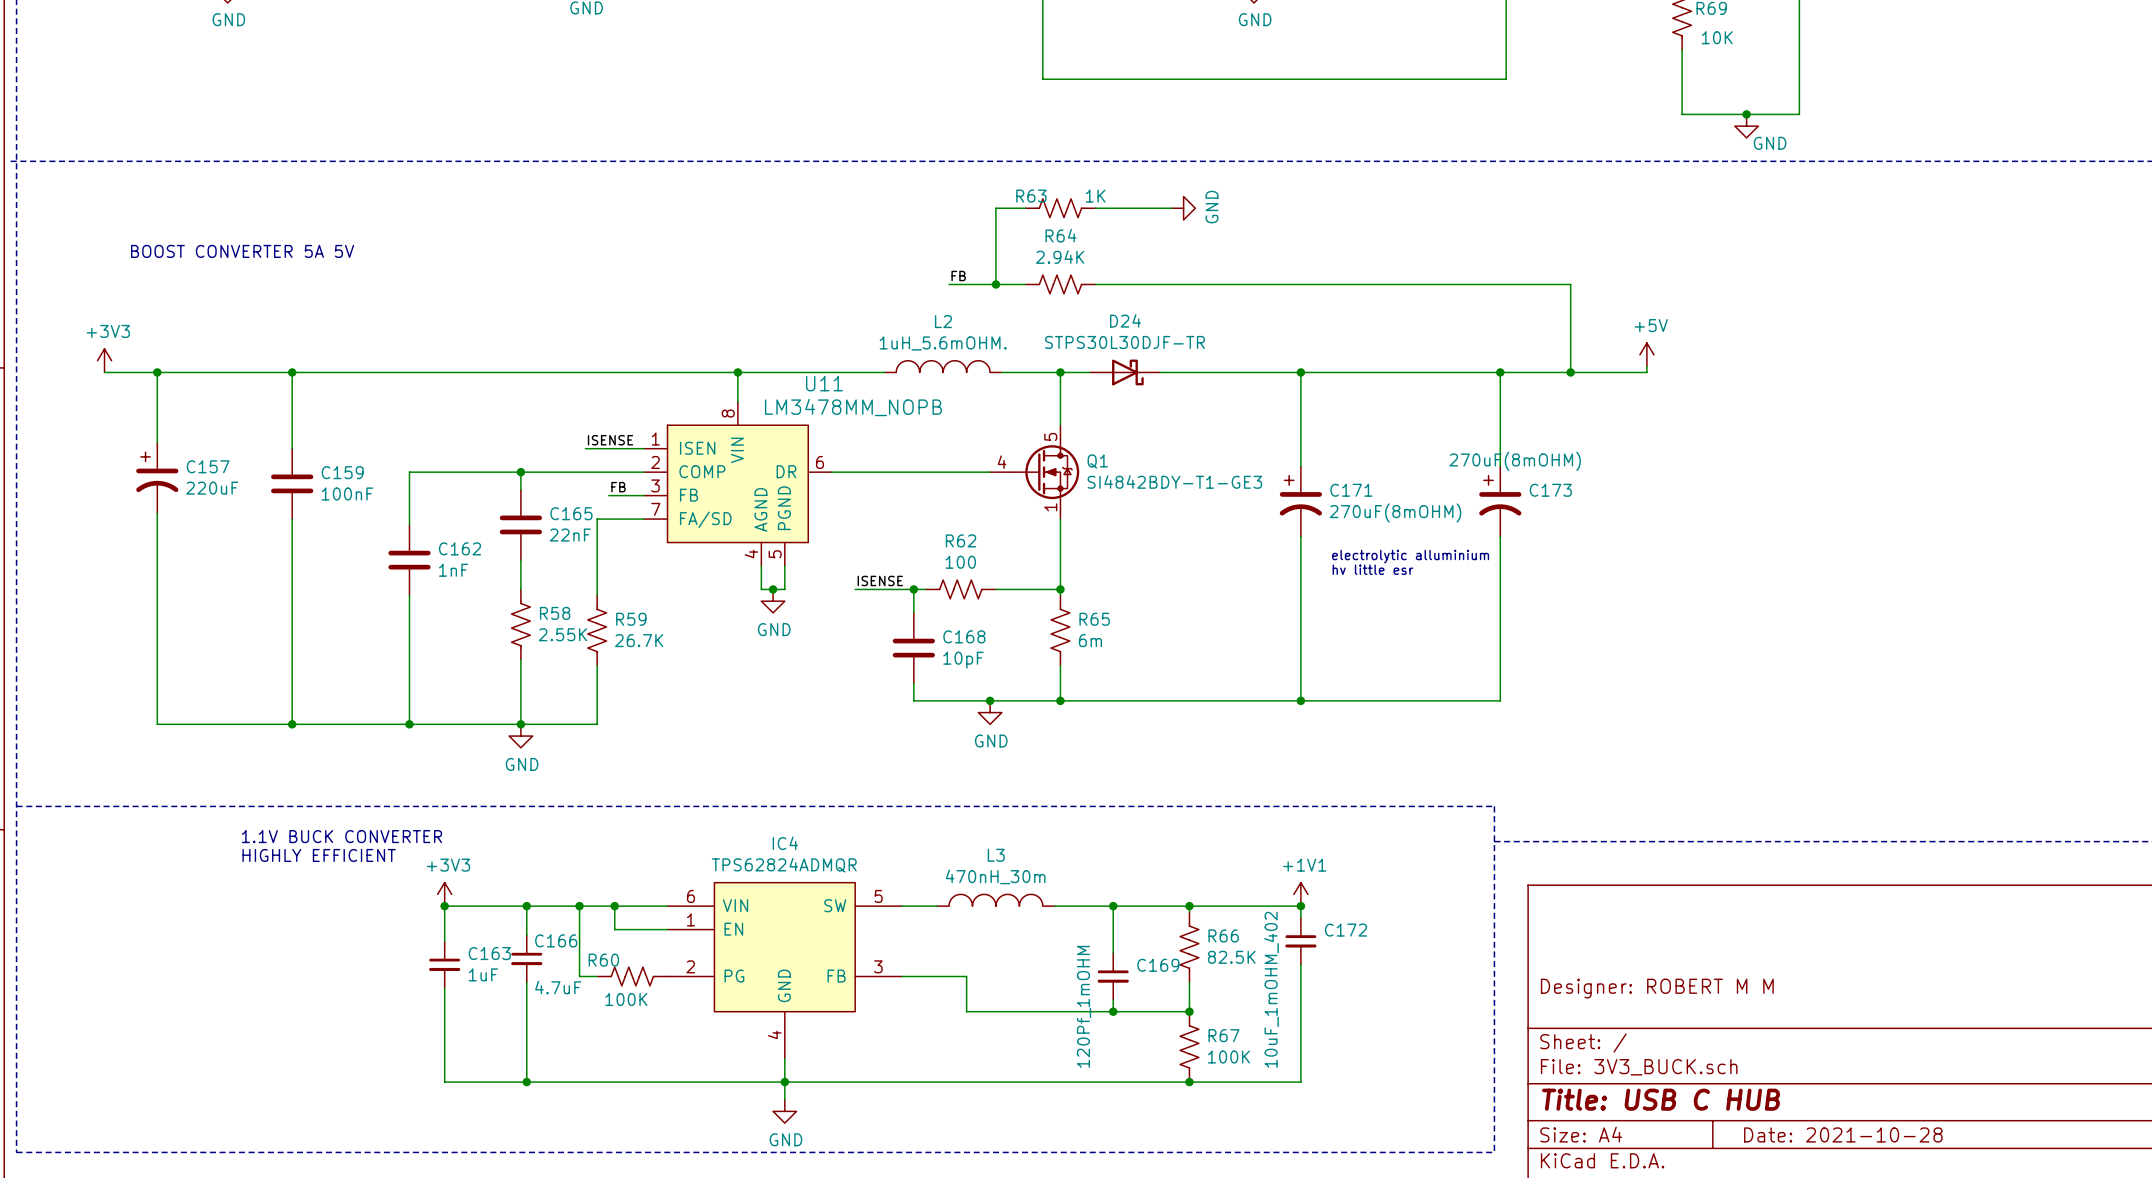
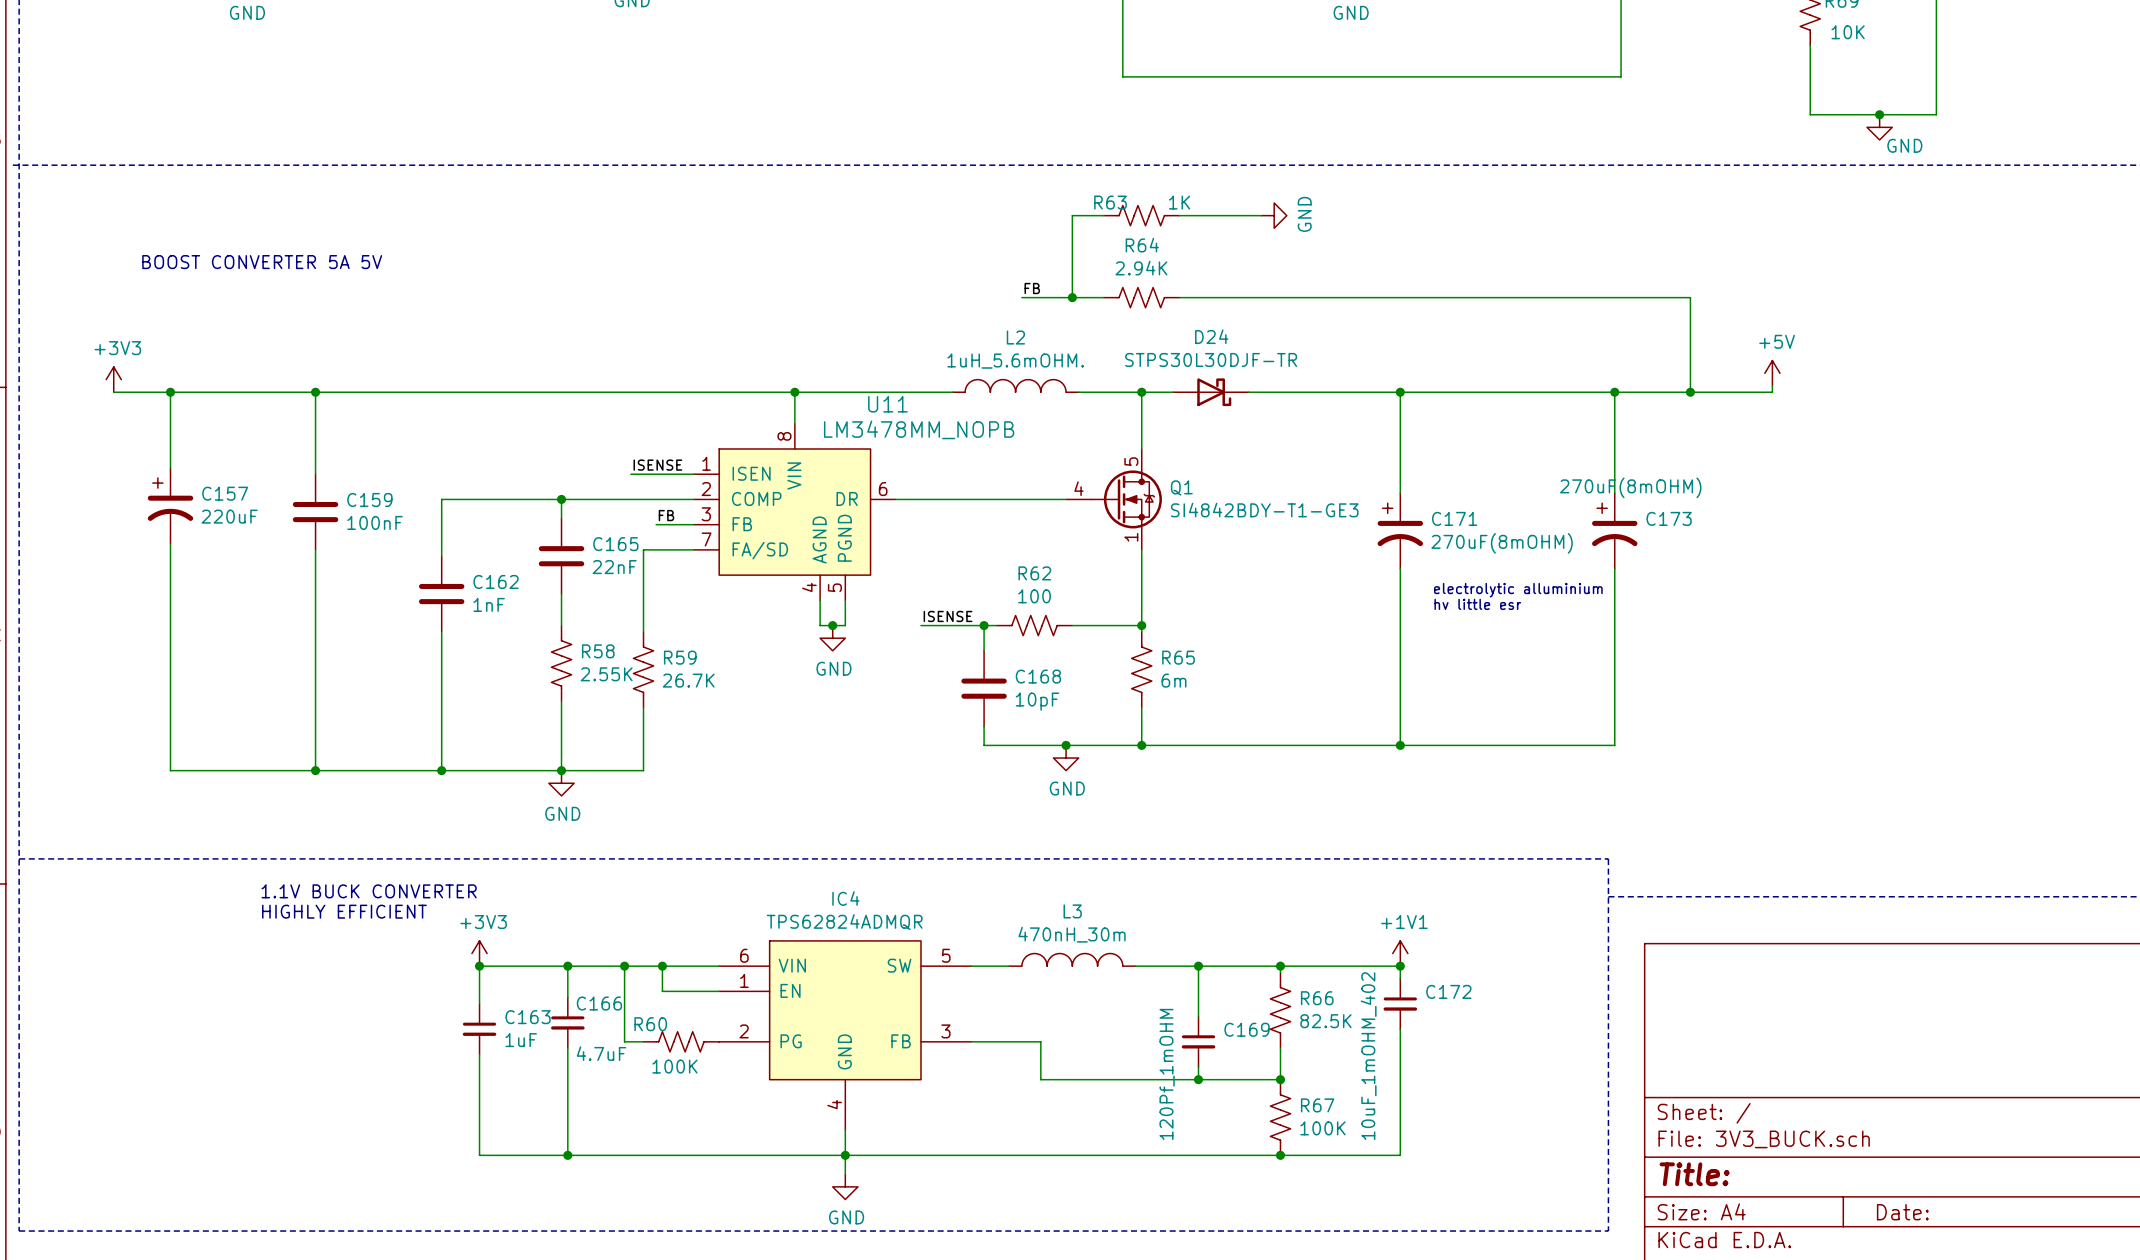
title block: Designer: ROBERT M M (1657, 988) -> none
title block: Title: USB C HUB (1661, 1099) -> Title: (1694, 1174)
title block: Date: 2021-10-28 (1843, 1134) -> Date: (1902, 1212)

